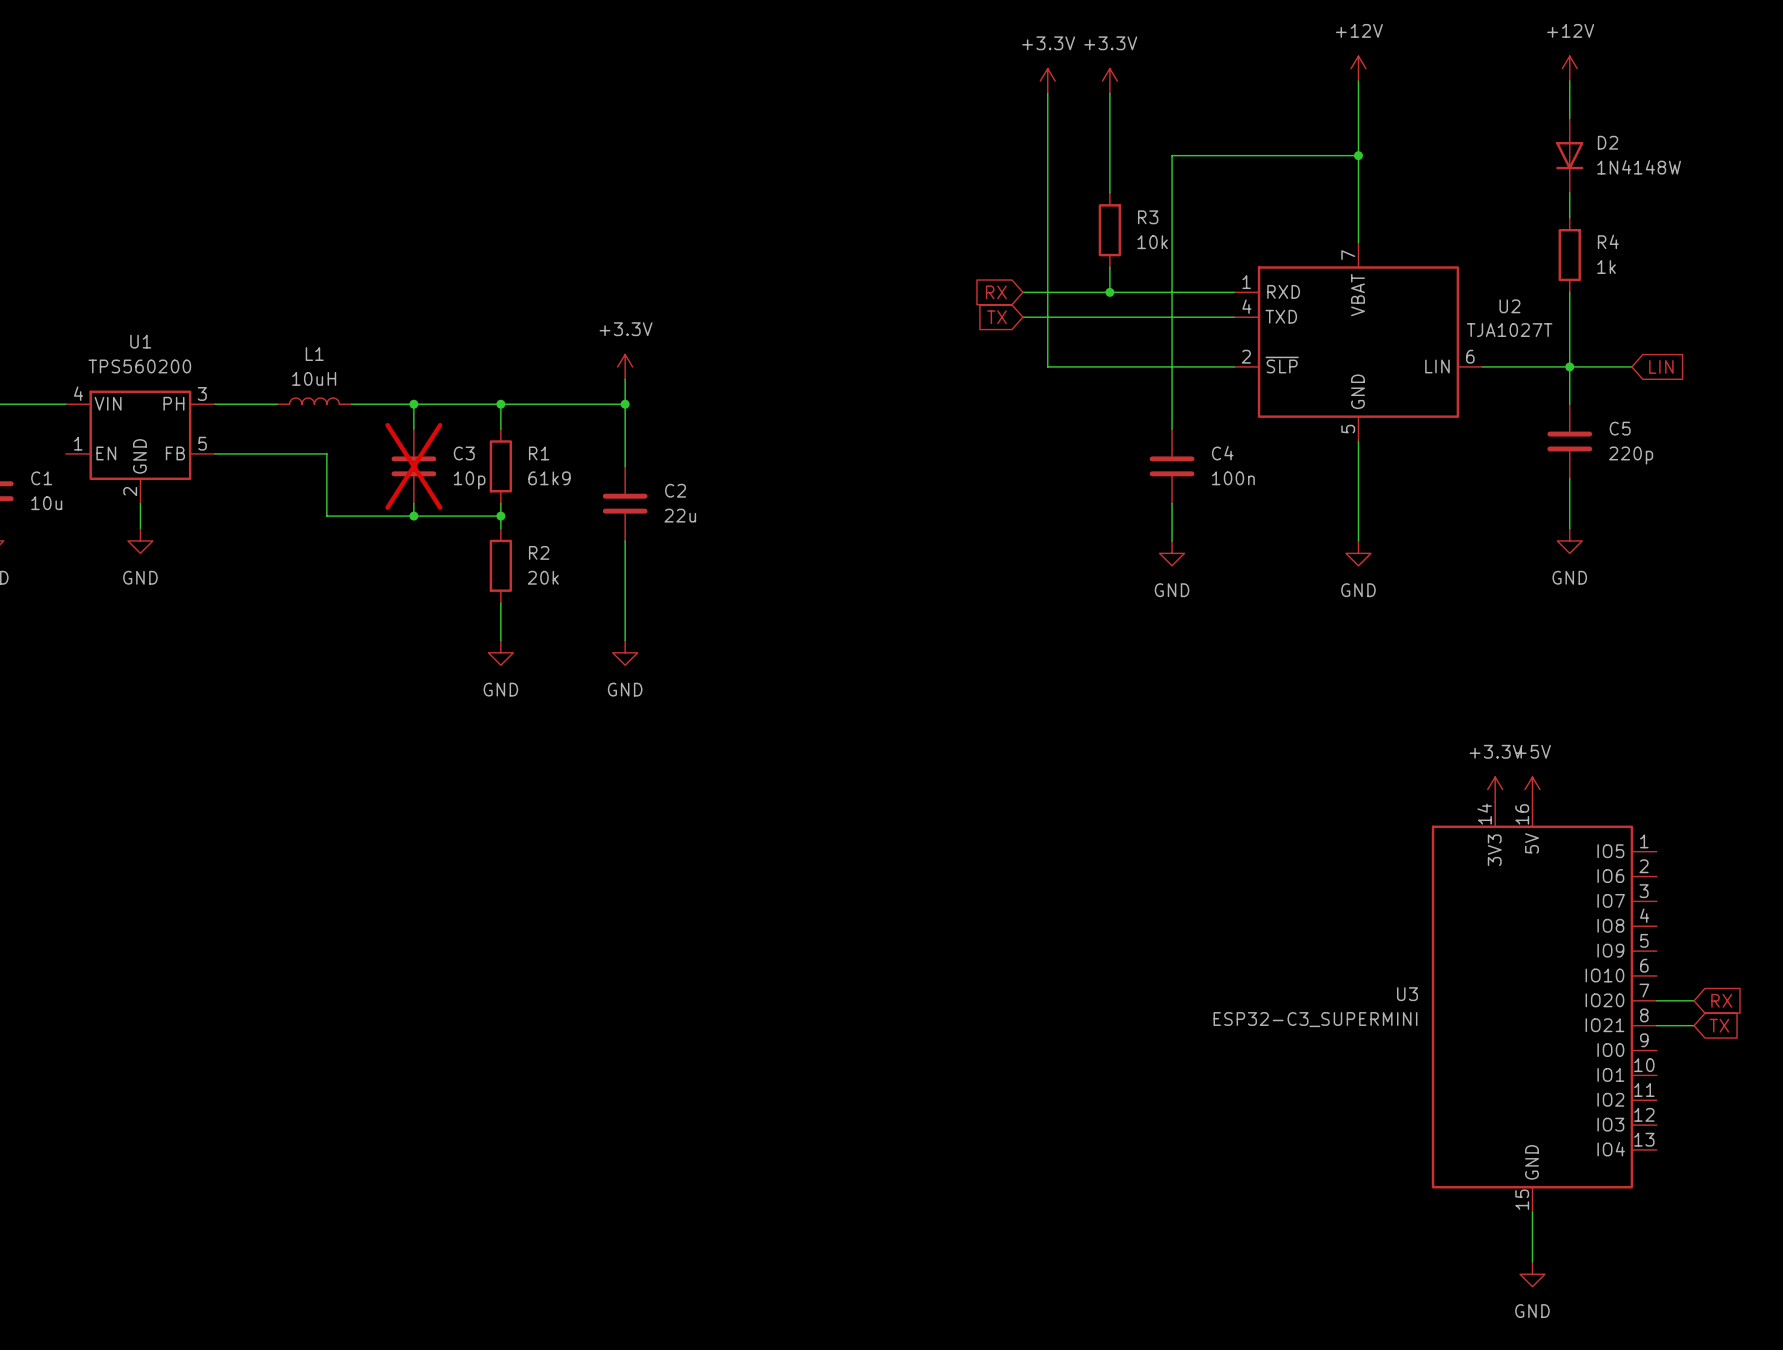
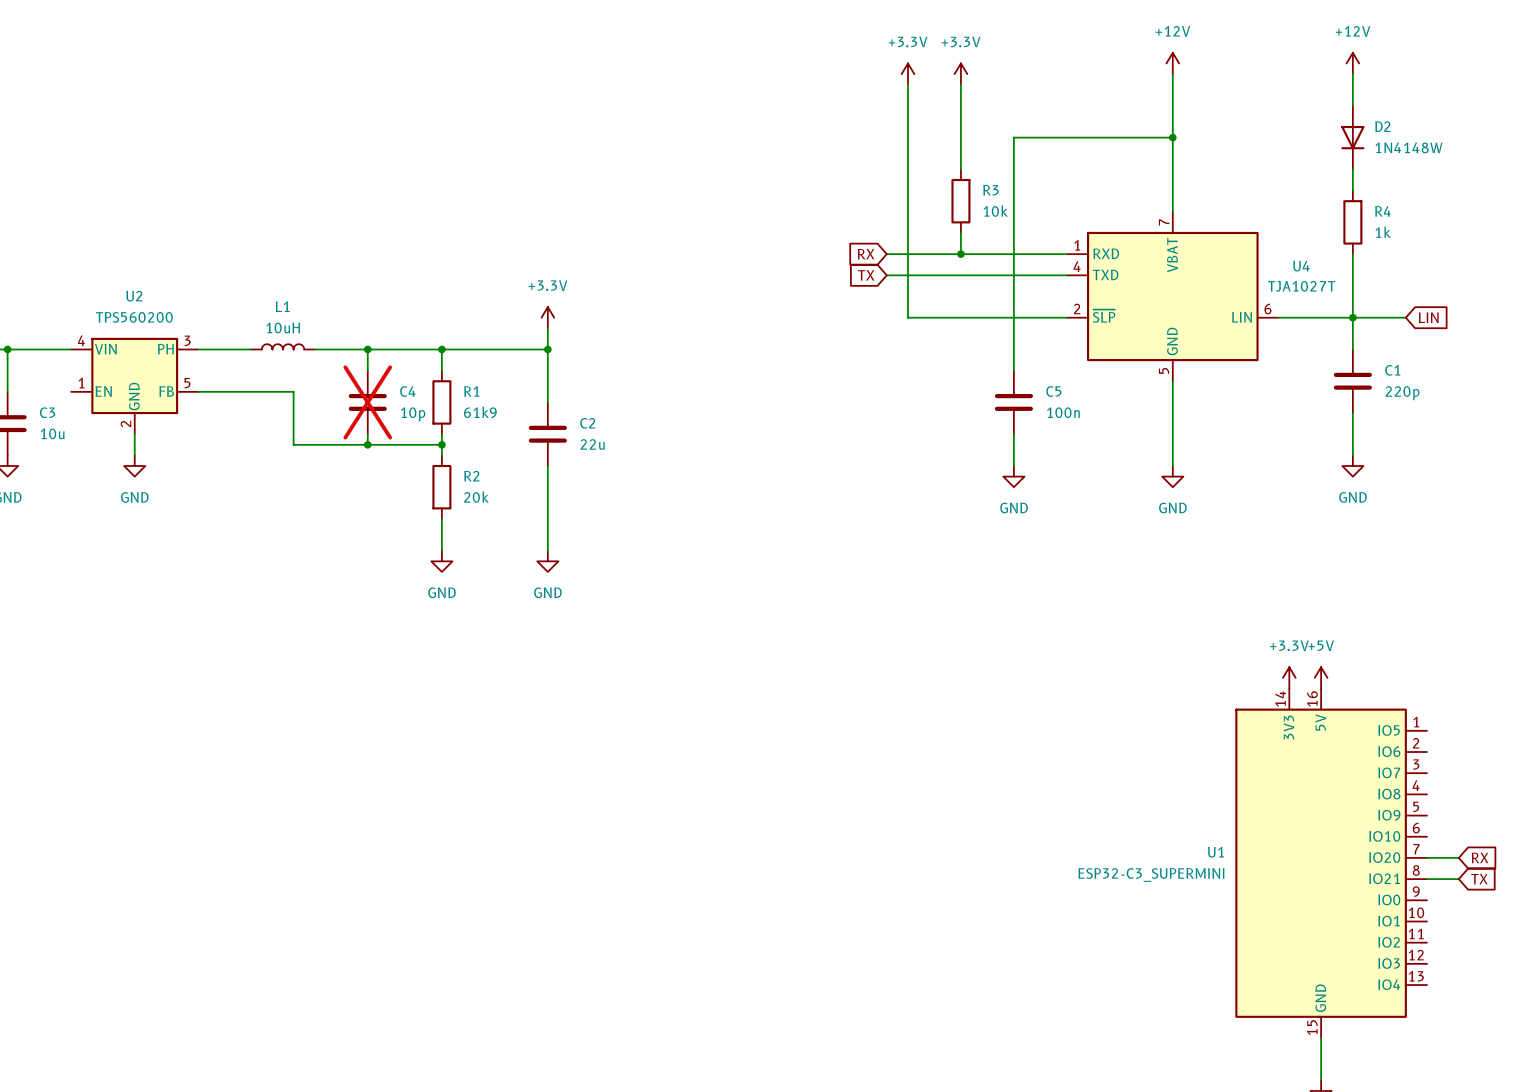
U2 name: U2 (1509, 306) -> U4 (1301, 266)
U1 name: U1 (140, 341) -> U2 (134, 296)
C5 name: C5 (1620, 428) -> C1 (1392, 370)
C3 name: C3 (464, 453) -> C4 (407, 391)
C4 name: C4 (1222, 453) -> C5 (1053, 391)
C1 name: C1 (41, 478) -> C3 (47, 412)
U3 name: U3 (1407, 994) -> U1 (1216, 852)

